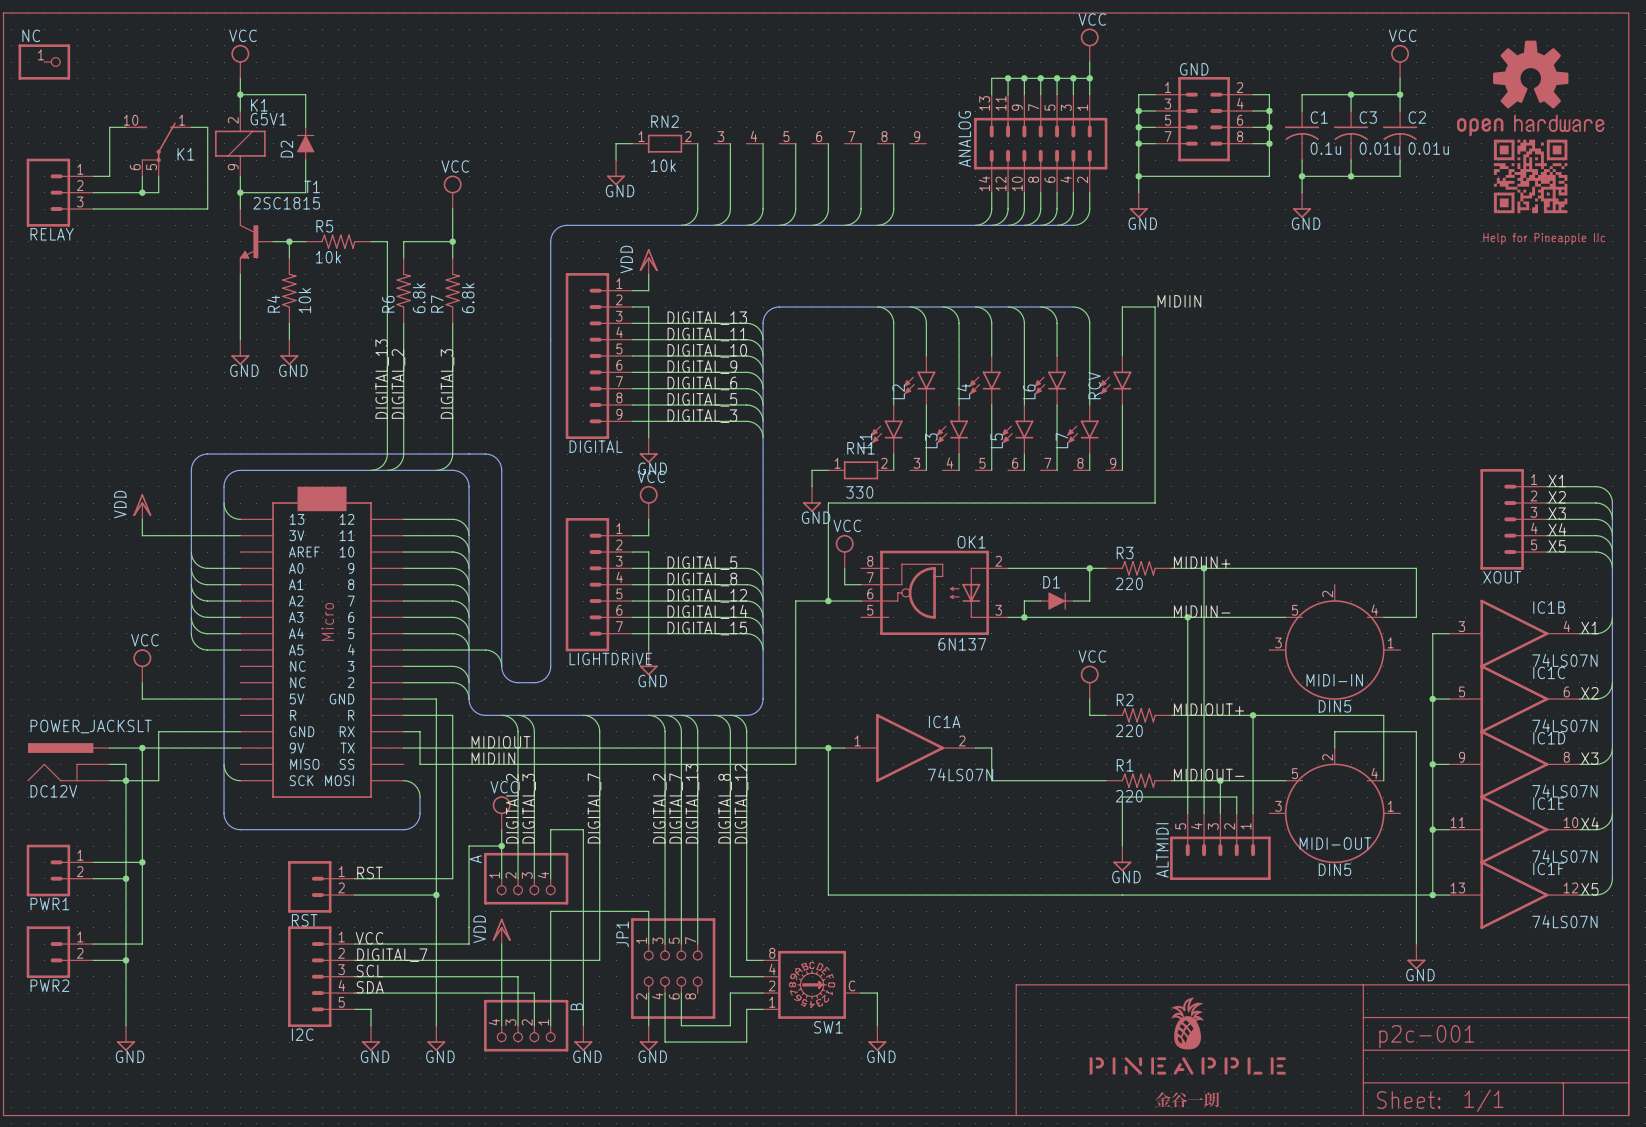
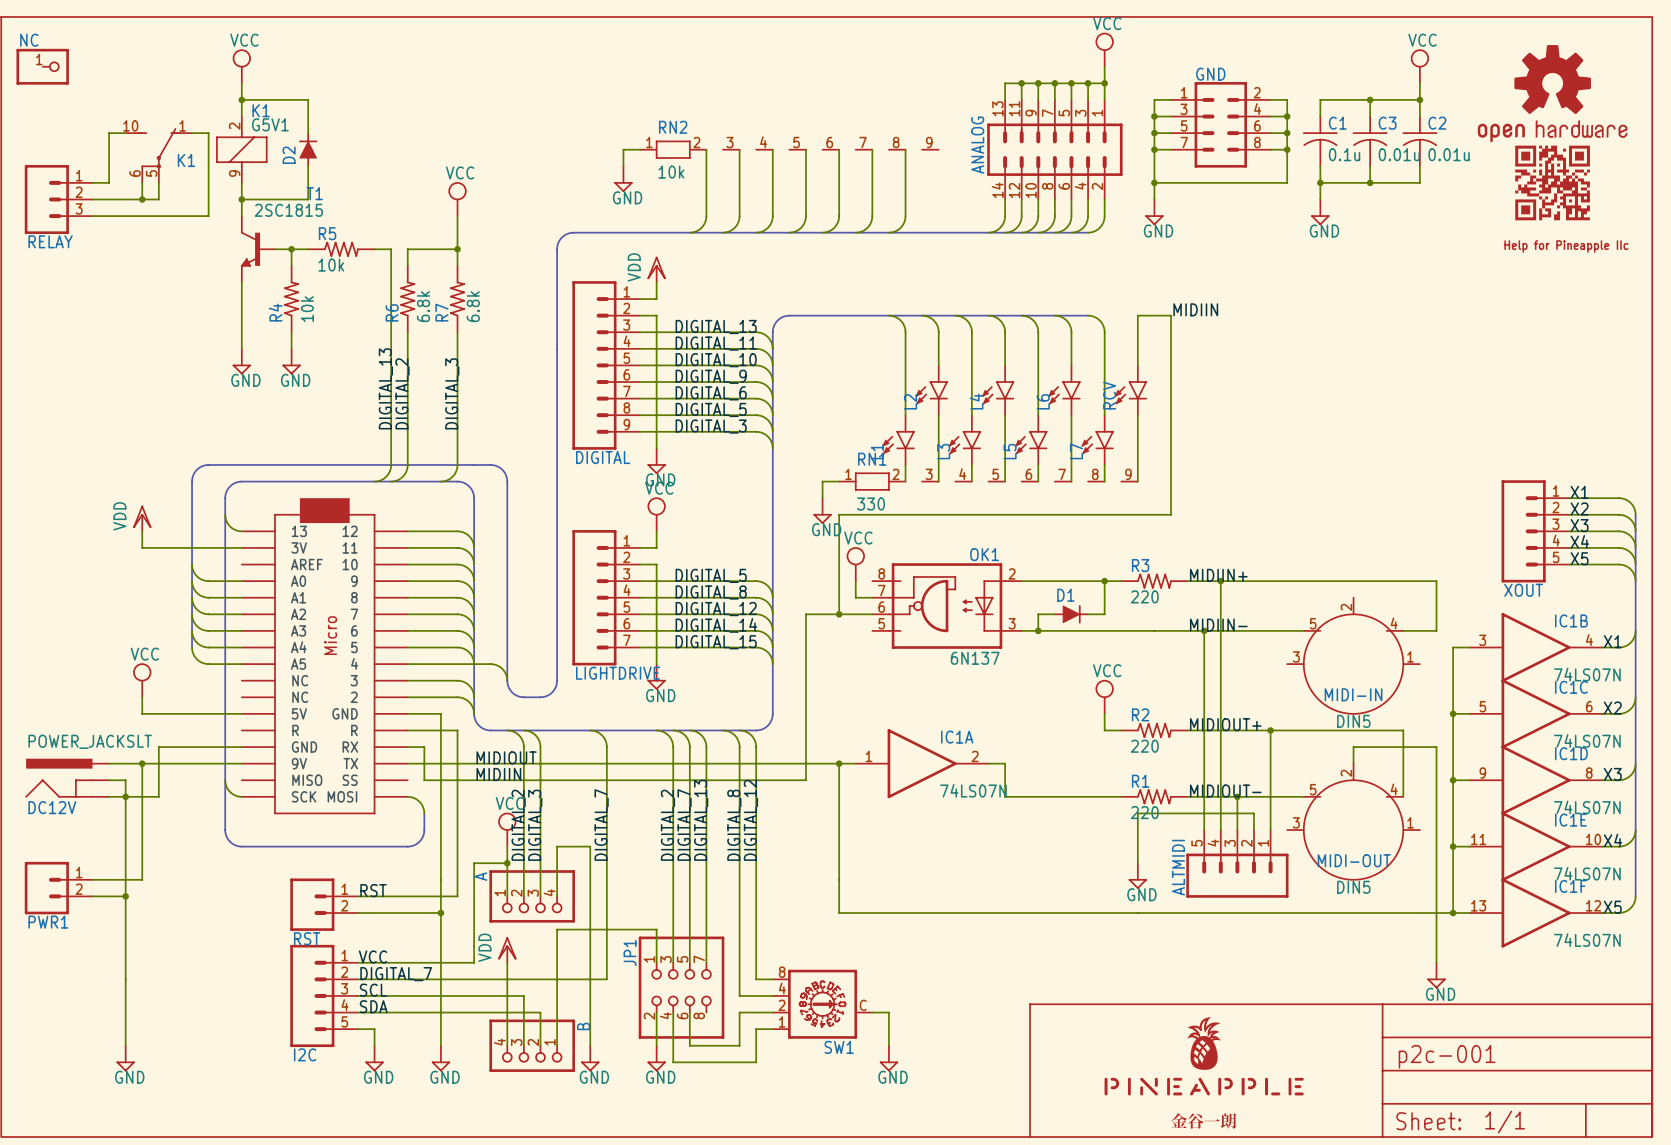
wire: (142, 862) (142, 944) (93, 944) -> none
junction: (142, 862) -> none
PWR2: (60, 952) -> none
wire: (93, 960) (126, 960) -> none
junction: (126, 960) -> none

